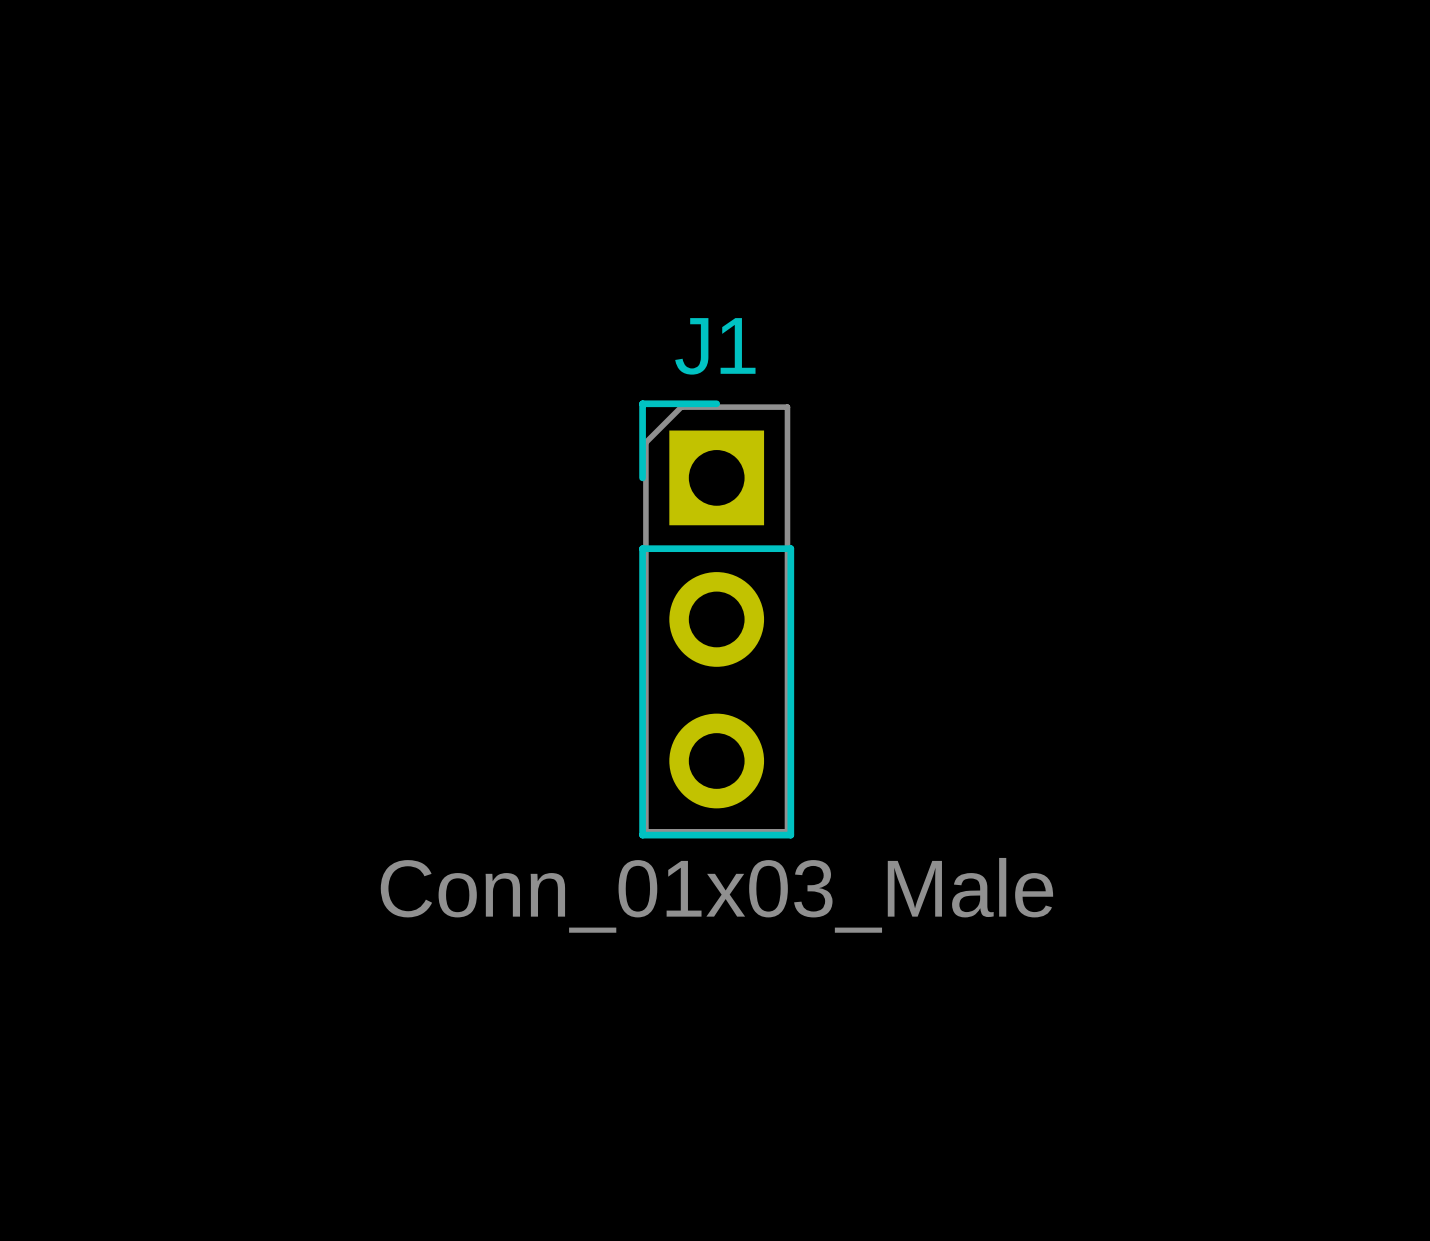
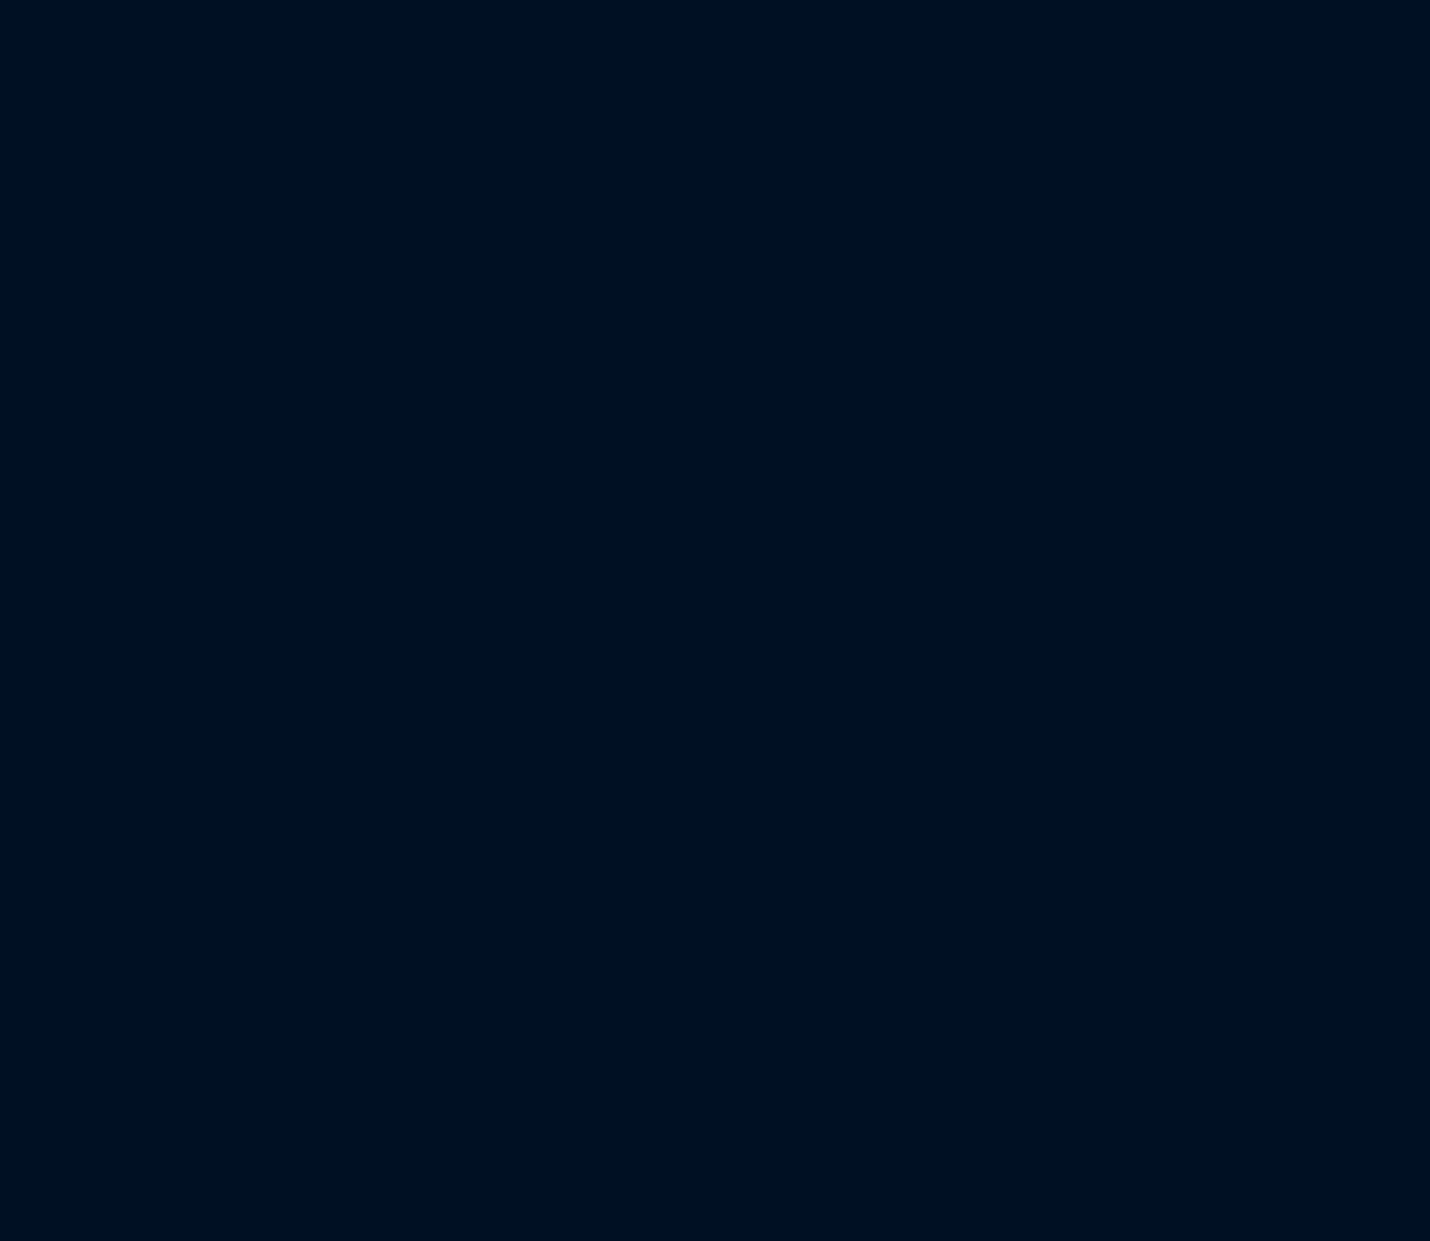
J1: Conn_01x03_Male (716, 619) -> none

